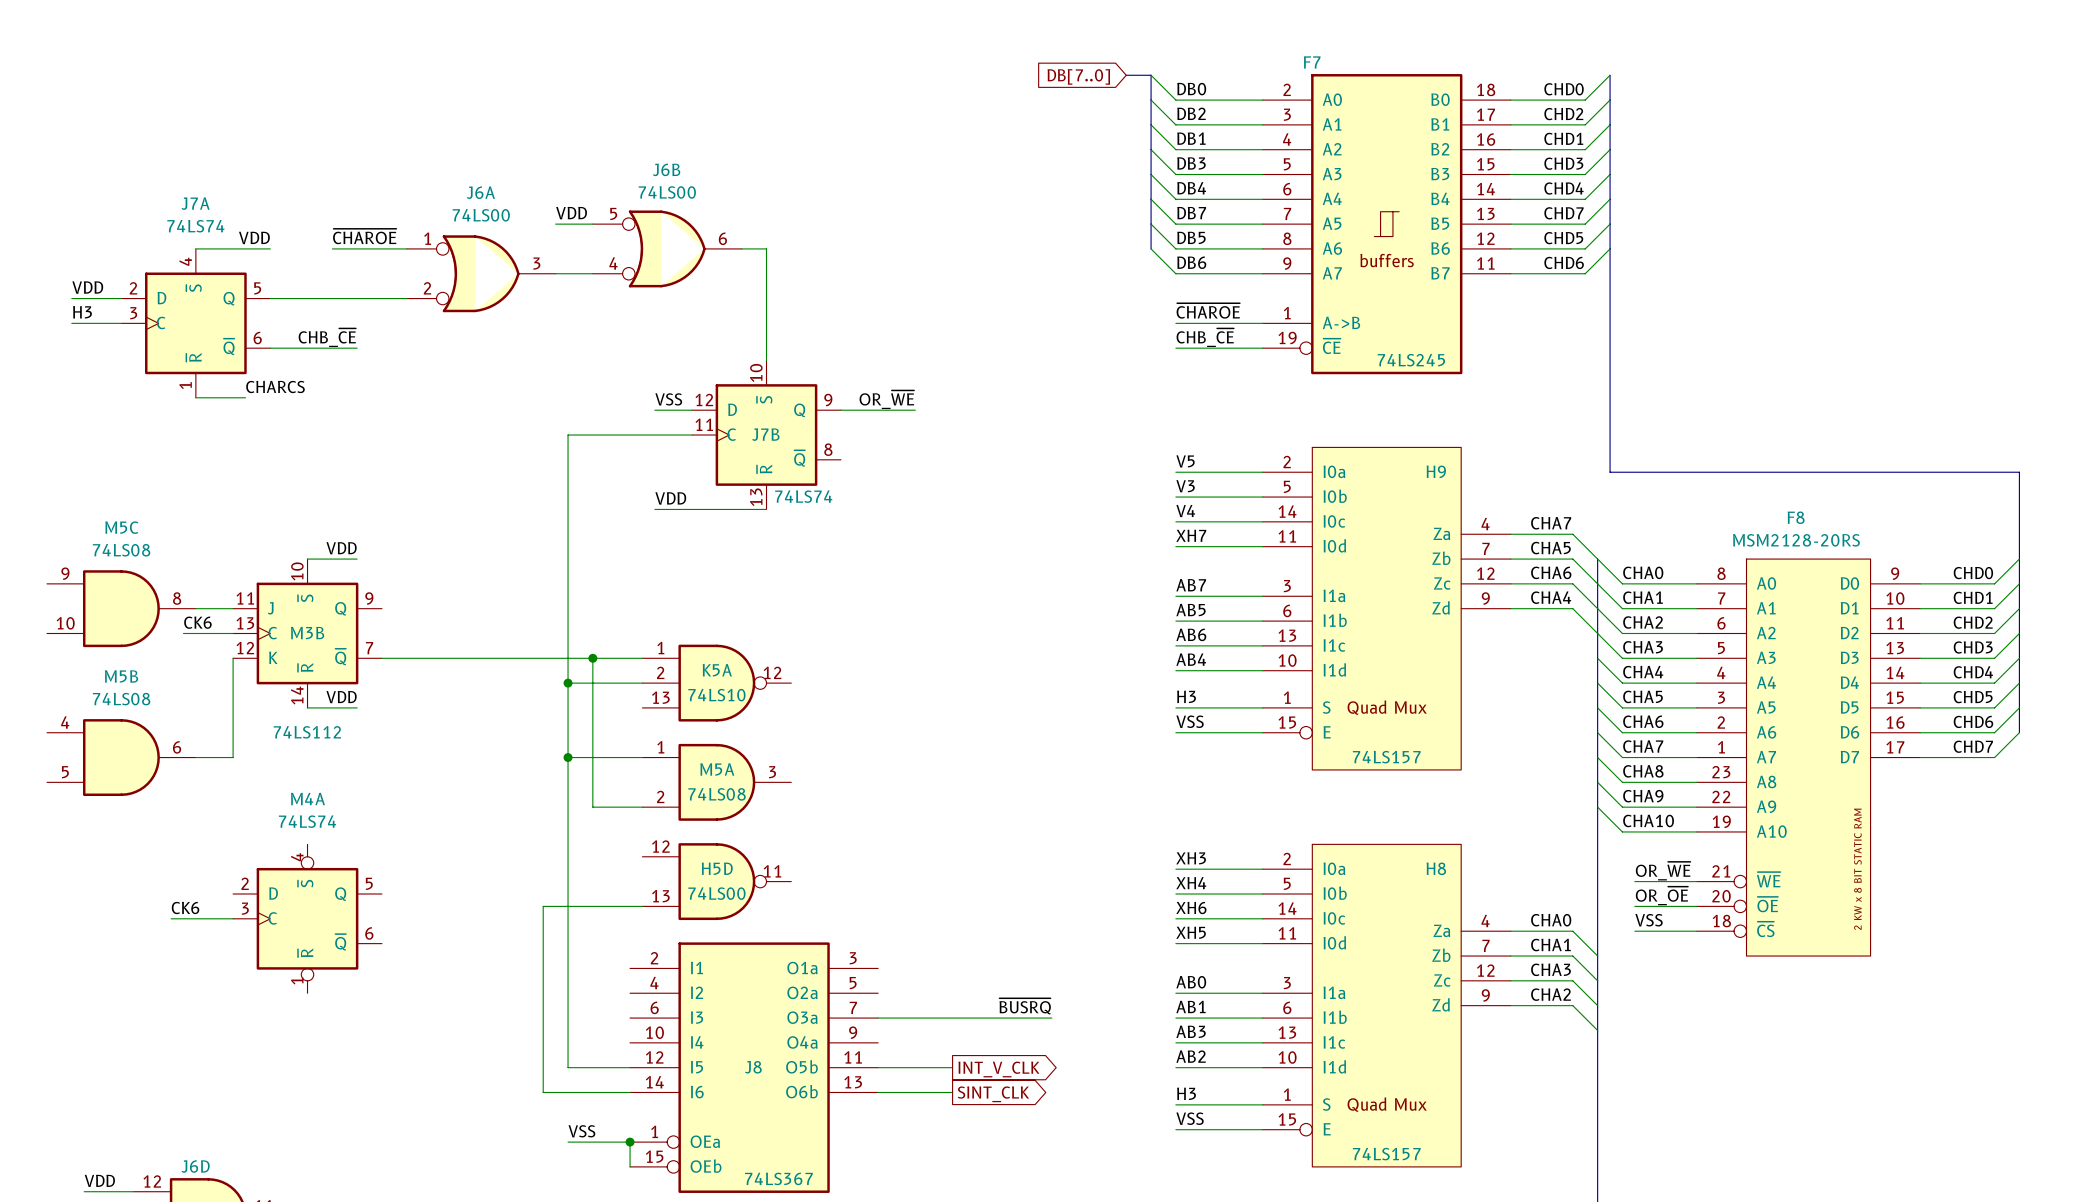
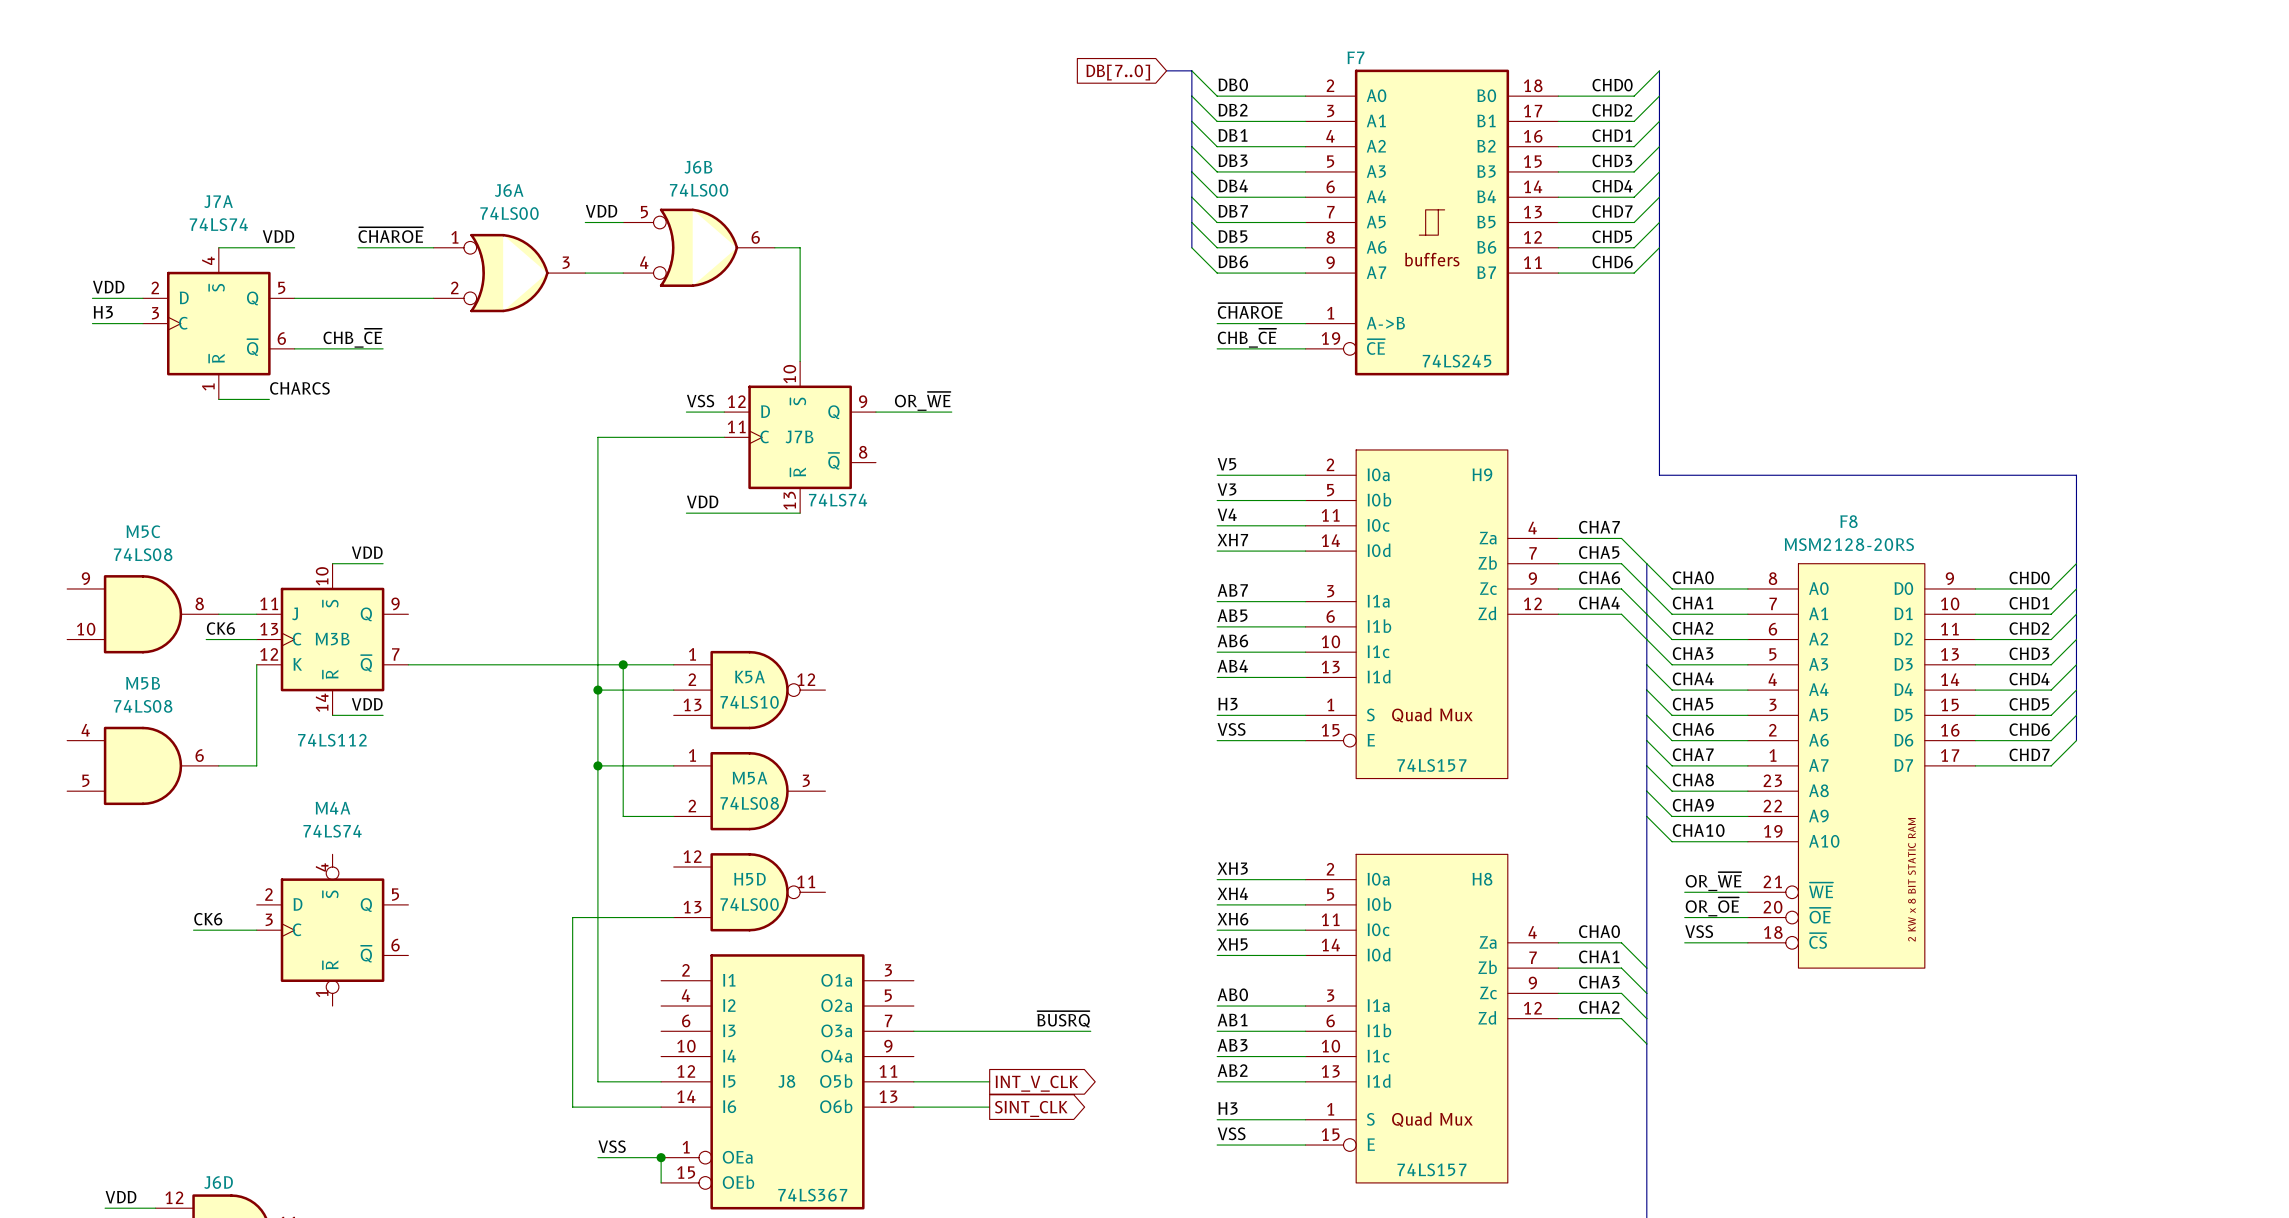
H9 pin number: 14 (1287, 511) -> 11 (1330, 515)
H9 pin number: 11 (1287, 536) -> 14 (1330, 540)
H9 pin number: 12 (1485, 573) -> 9 (1532, 578)
H9 pin number: 9 (1485, 598) -> 12 (1532, 603)
H9 pin number: 13 (1287, 635) -> 10 (1330, 641)
H9 pin number: 10 (1287, 660) -> 13 (1330, 667)
H8 pin number: 14 (1287, 908) -> 11 (1330, 919)
H8 pin number: 11 (1287, 933) -> 14 (1330, 945)
H8 pin number: 12 (1485, 970) -> 9 (1532, 983)
H8 pin number: 9 (1485, 995) -> 12 (1532, 1008)
H8 pin number: 13 (1287, 1032) -> 10 (1330, 1046)
H8 pin number: 10 (1287, 1057) -> 13 (1330, 1071)

